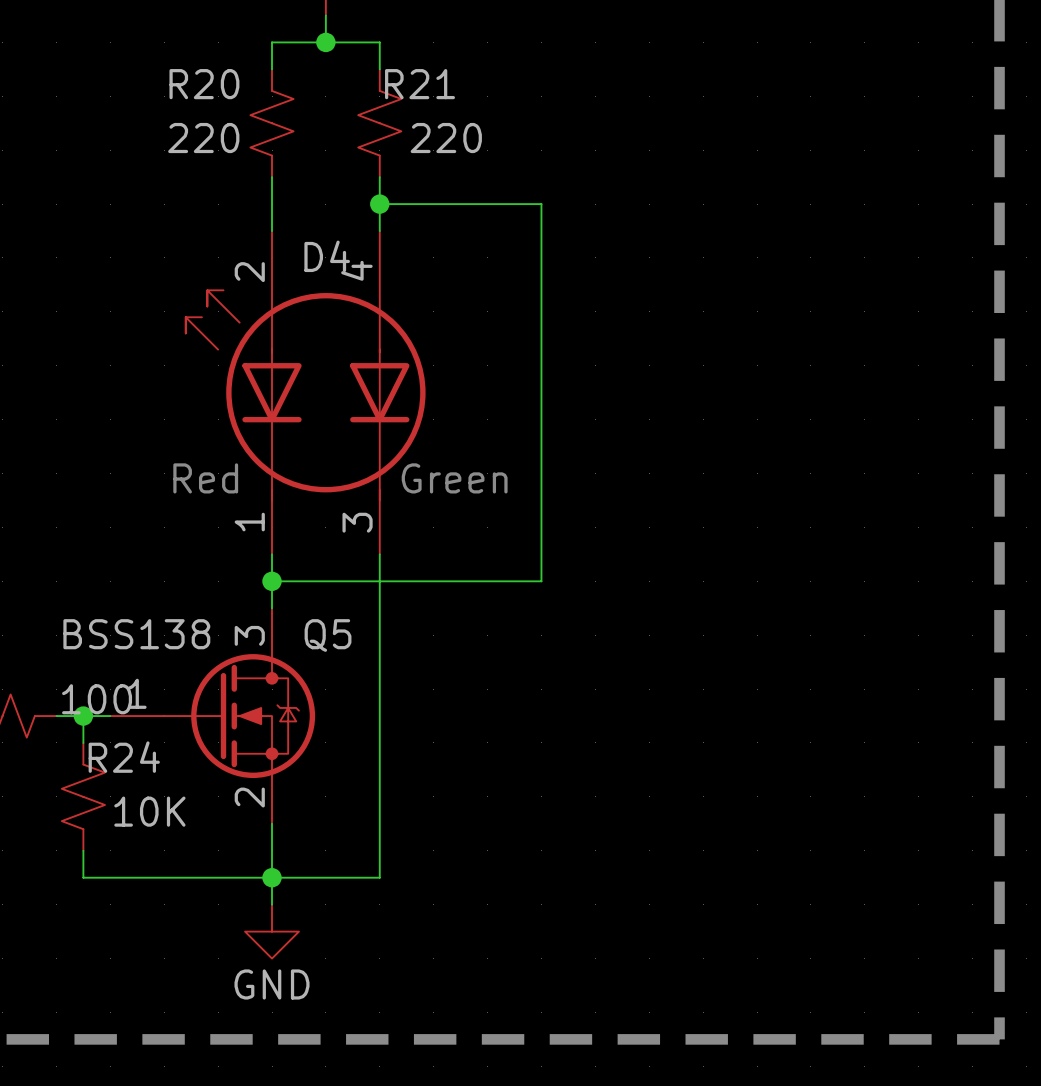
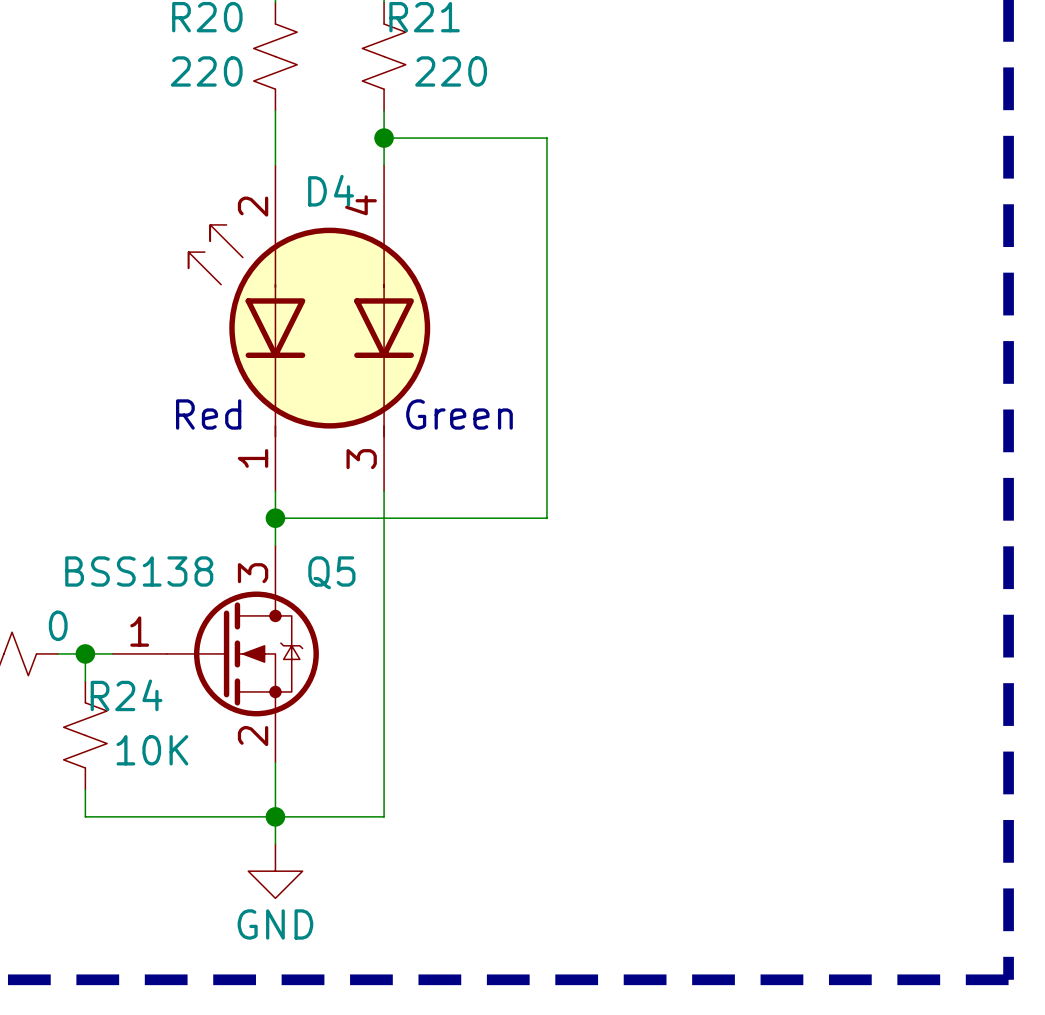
part value: 100 (97, 699) -> 0 (58, 625)

